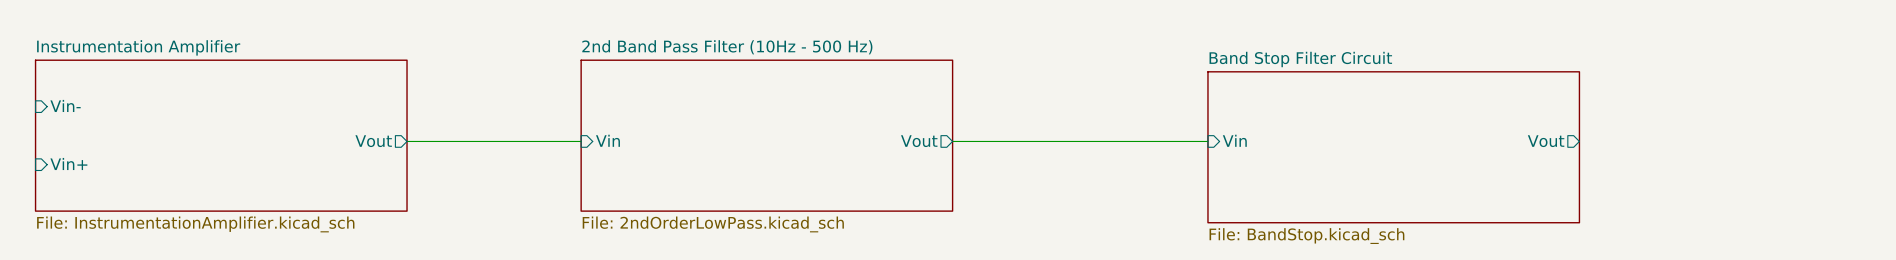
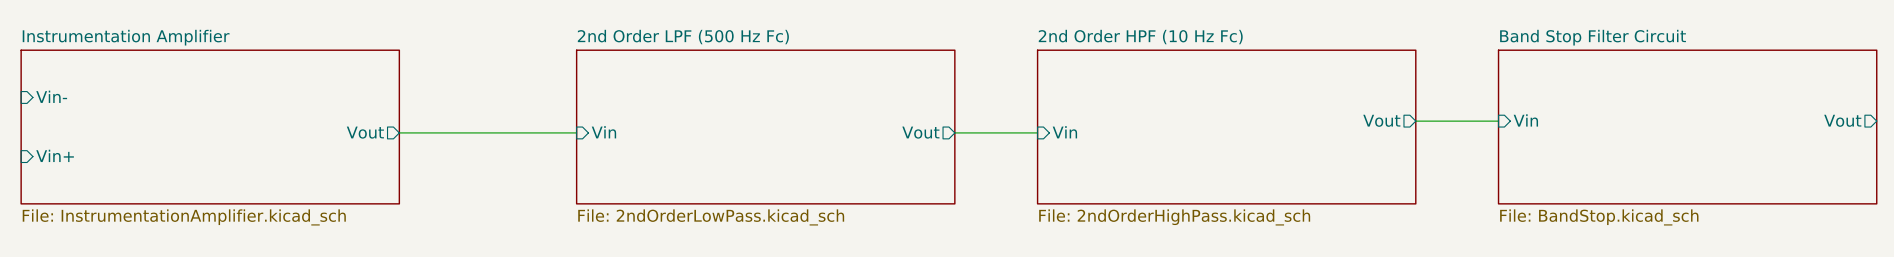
sheet 2nd Band Pass Filter (10Hz - 500 Hz) name: 2nd Band Pass Filter (10Hz - 500 Hz) (727, 47) -> 2nd Order LPF (500 Hz Fc) (683, 37)
sheet pin: none -> Vout (1381, 120)
wire: none -> (1415, 121) (1498, 121)
sheet pin: none -> Vin (1525, 120)
sheet pin: none -> Vout (1842, 120)
sheet 2nd Order HPF (10 Hz Fc): none -> File: 2ndOrderHighPass.kicad_sch (1226, 127)
sheet Band Stop Filter Circuit: none -> File: BandStop.kicad_sch (1687, 127)
sheet pin: none -> Vin (1064, 132)
sheet pin: Vin (1234, 140) -> none
wire: (1033, 141) (1207, 141) -> none
sheet pin: Vout (1546, 141) -> none
sheet Band Stop Filter Circuit: File: BandStop.kicad_sch (1393, 147) -> none

